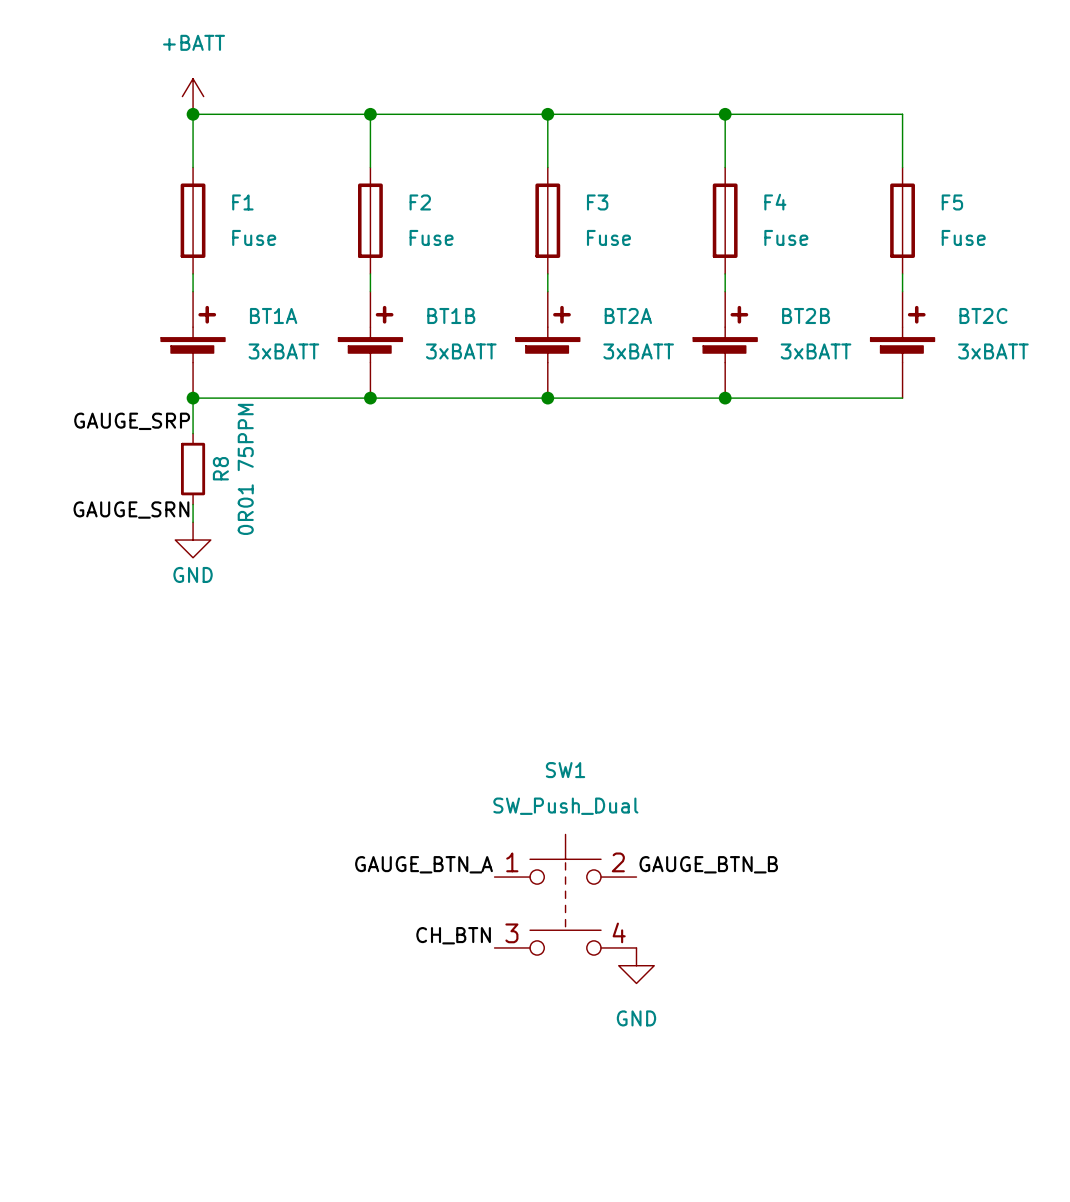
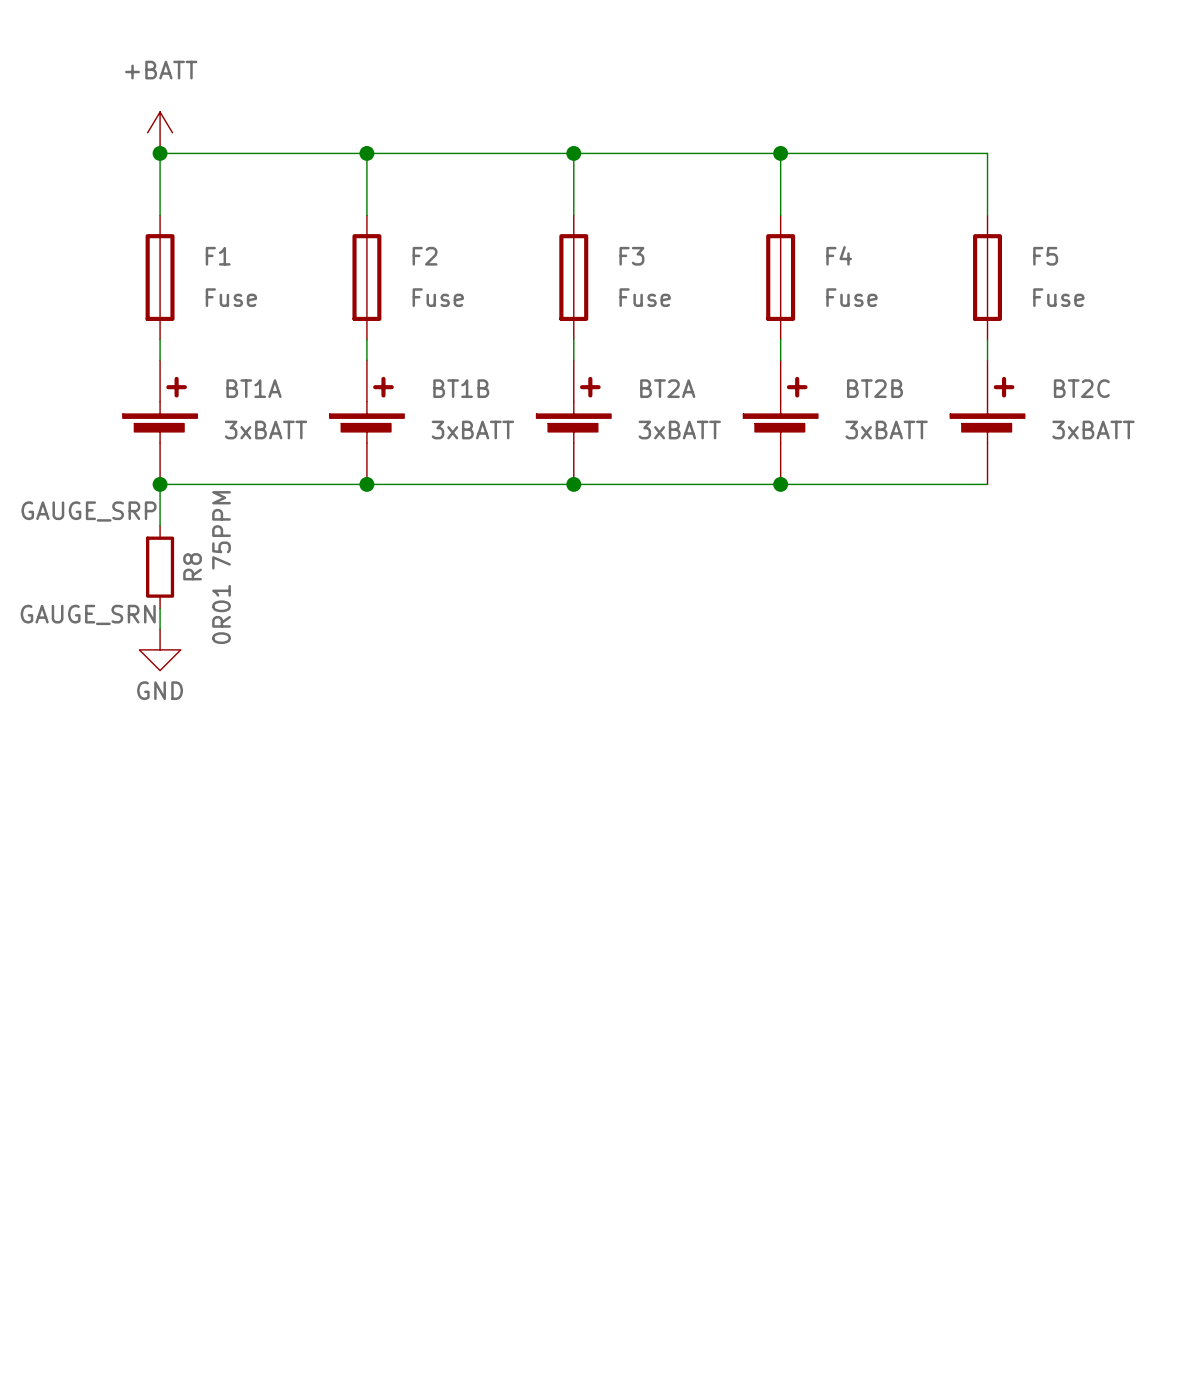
label: GAUGE_BTN_A (424, 864) -> none
label: GAUGE_BTN_B (708, 864) -> none
SW1: SW_Push_Dual (565, 894) -> none
label: CH_BTN (453, 935) -> none
power symbol: GND (636, 965) -> none

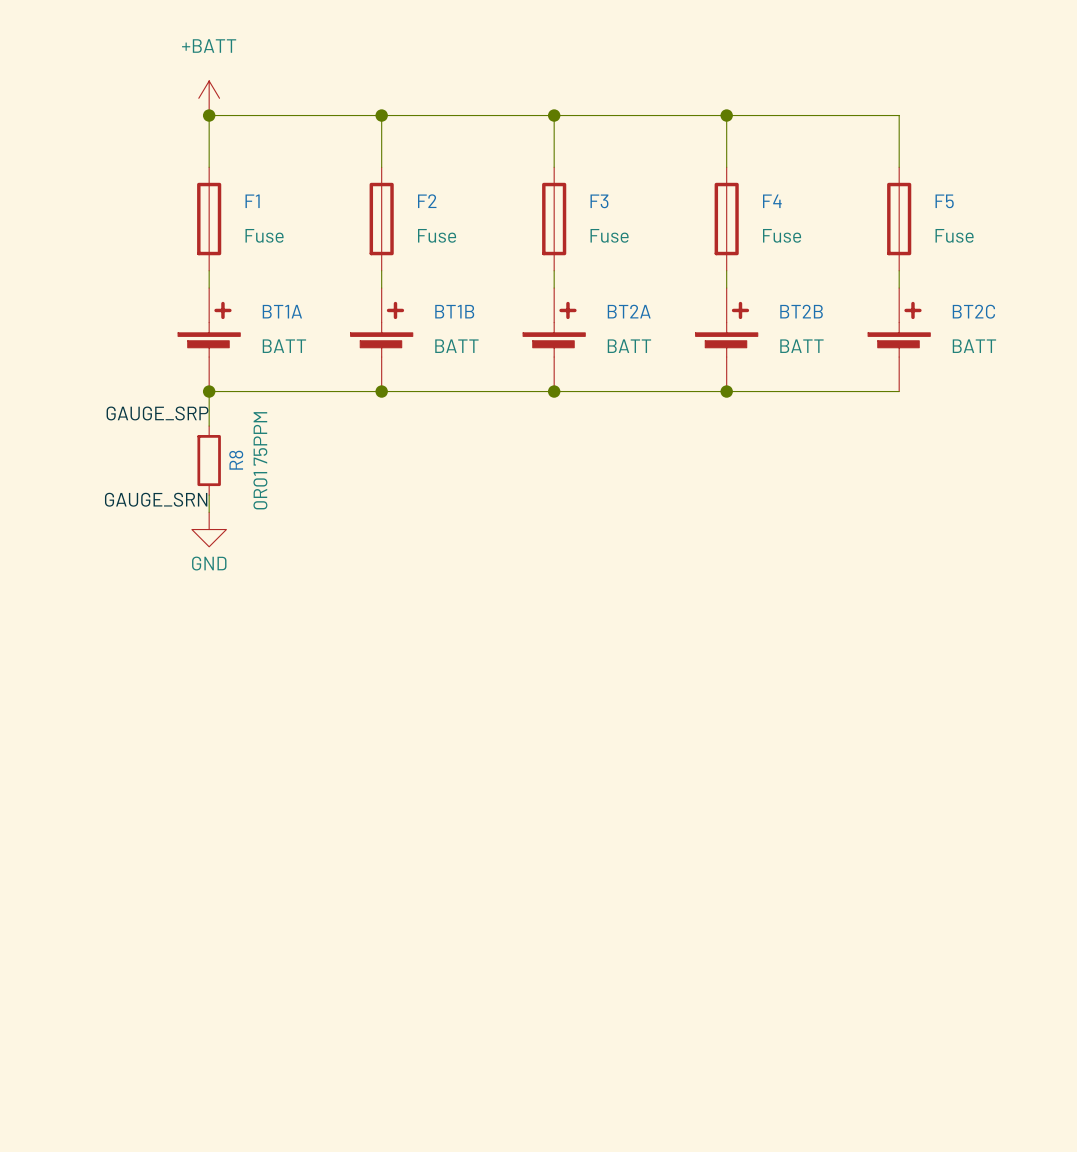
BT1A value: 3xBATT (266, 430) -> BATT (284, 346)
BT1B value: 3xBATT (472, 430) -> BATT (456, 346)
BT2A value: 3xBATT (679, 430) -> BATT (629, 346)
BT2B value: 3xBATT (886, 430) -> BATT (801, 346)
BT2C value: 3xBATT (1093, 430) -> BATT (974, 346)

